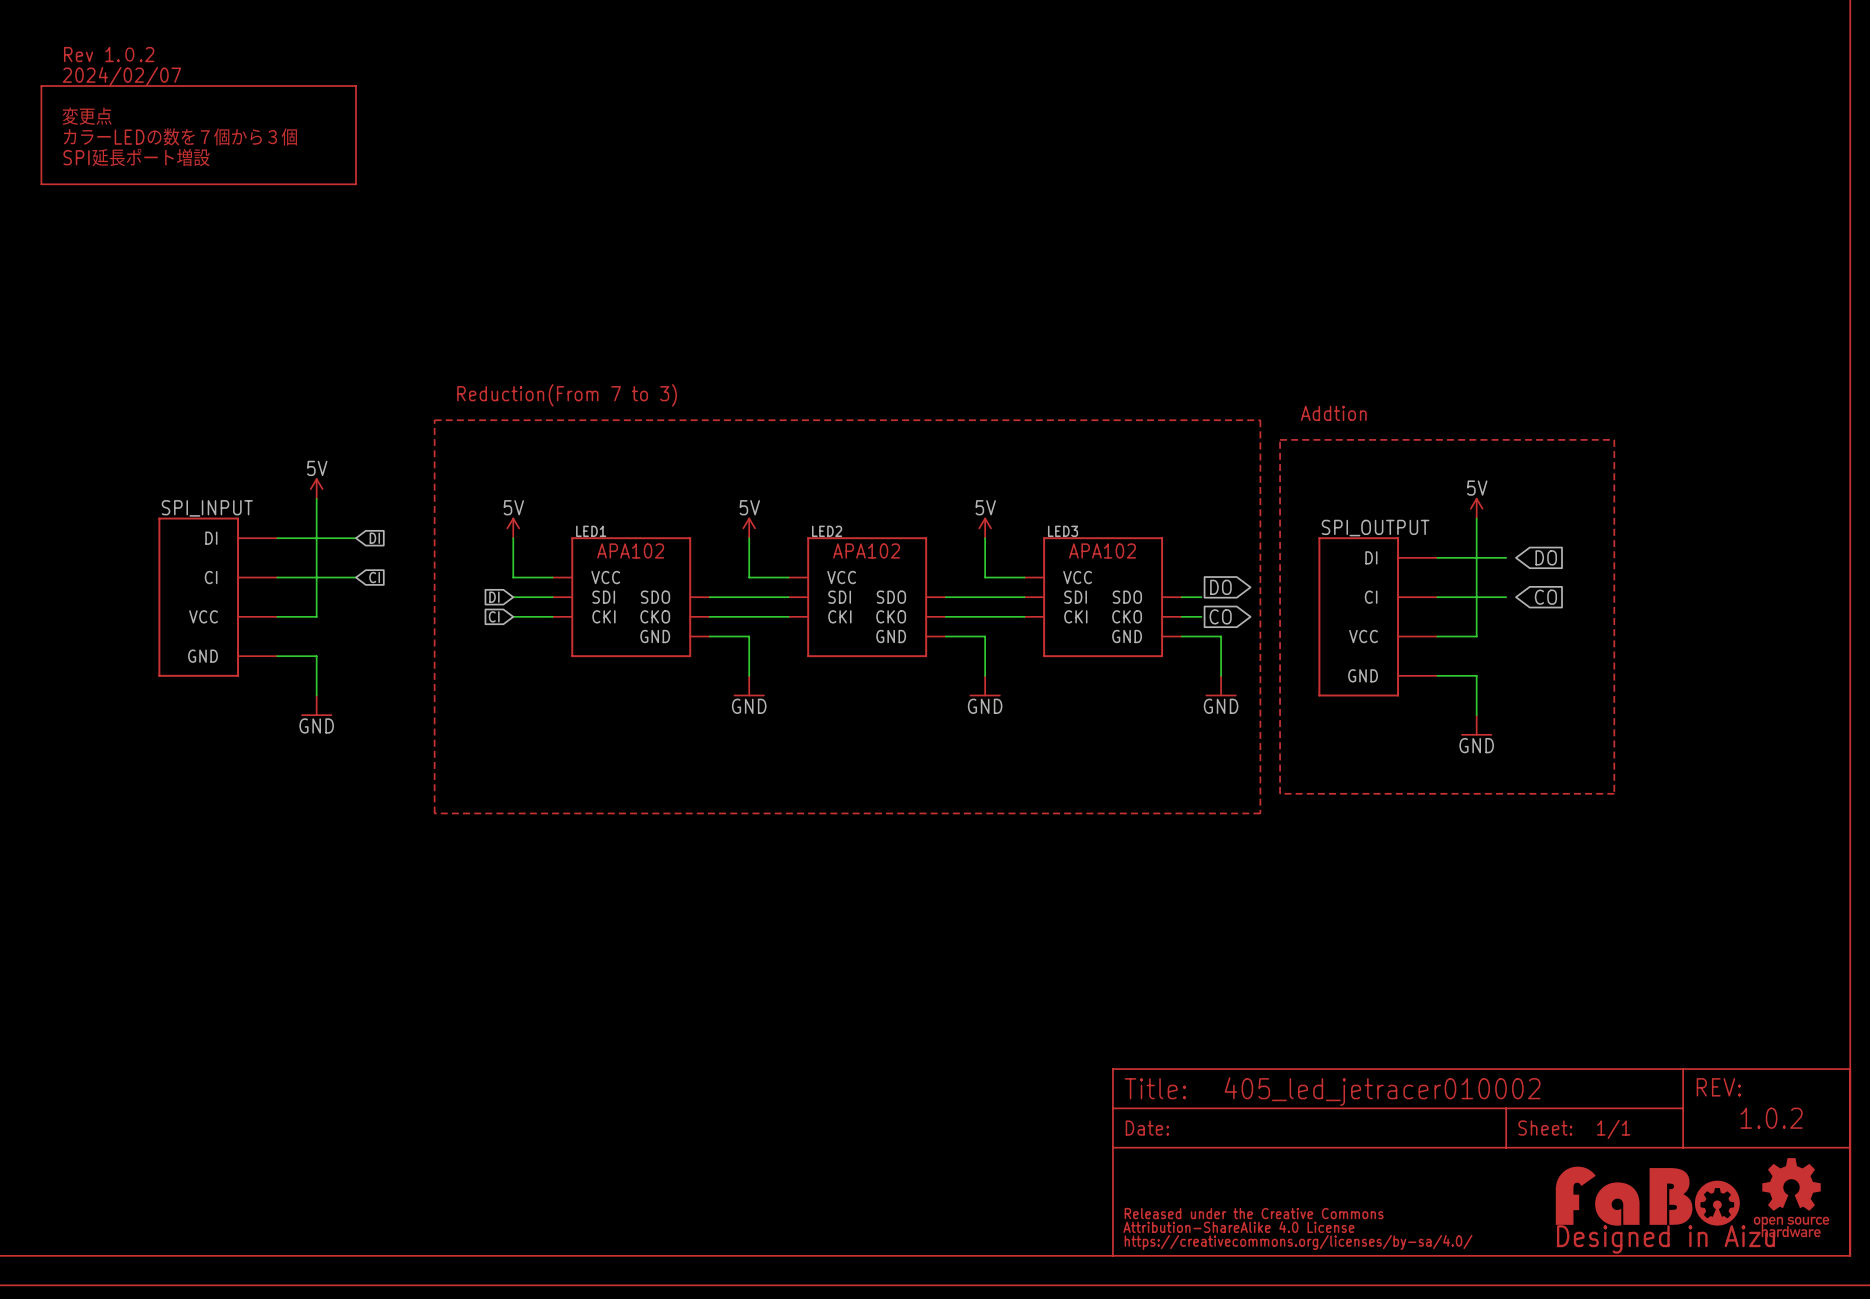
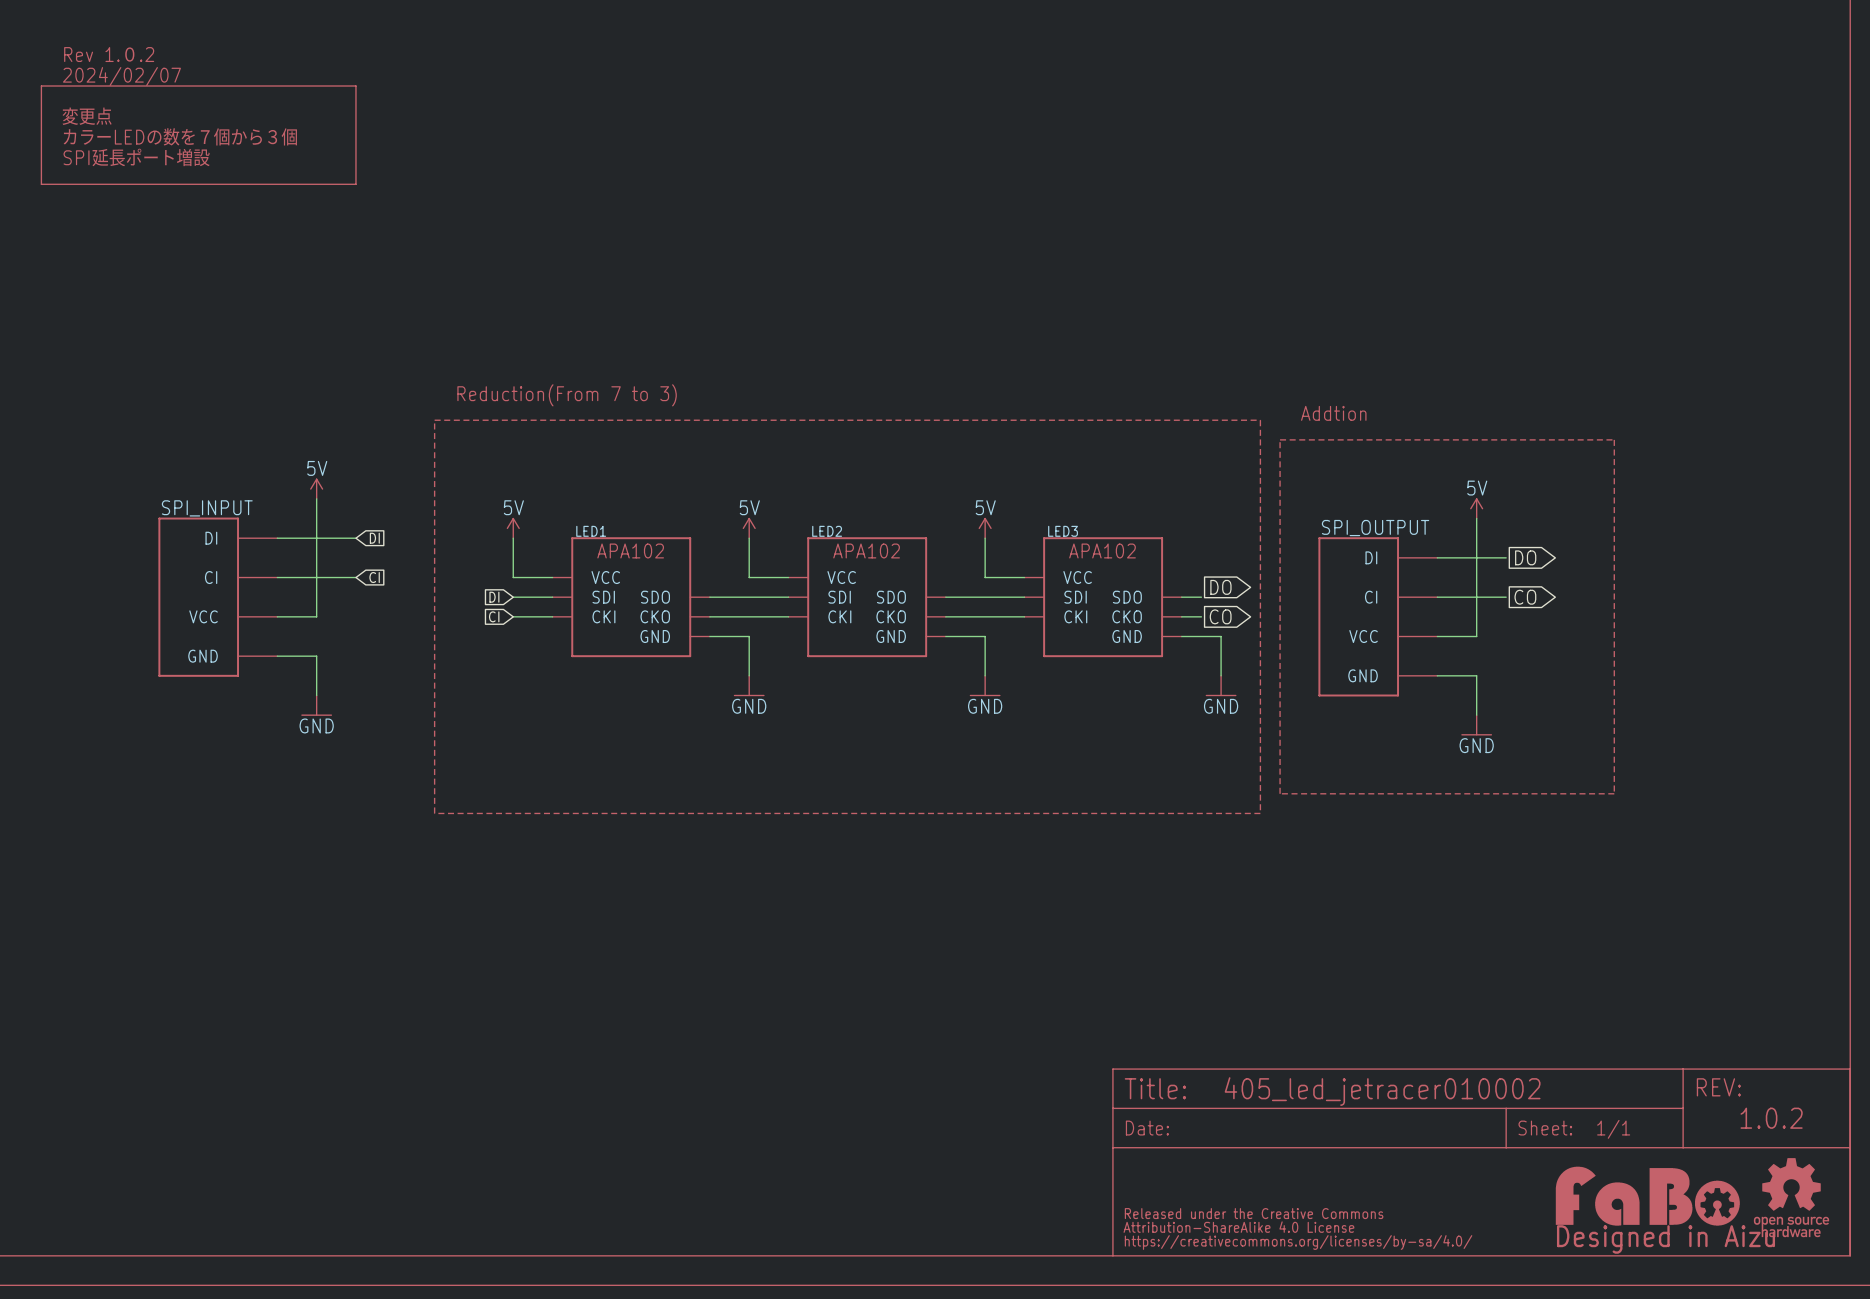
global label rotation: 0° (1546, 557) -> 180° (1525, 557)
global label rotation: 0° (1545, 597) -> 180° (1525, 597)

